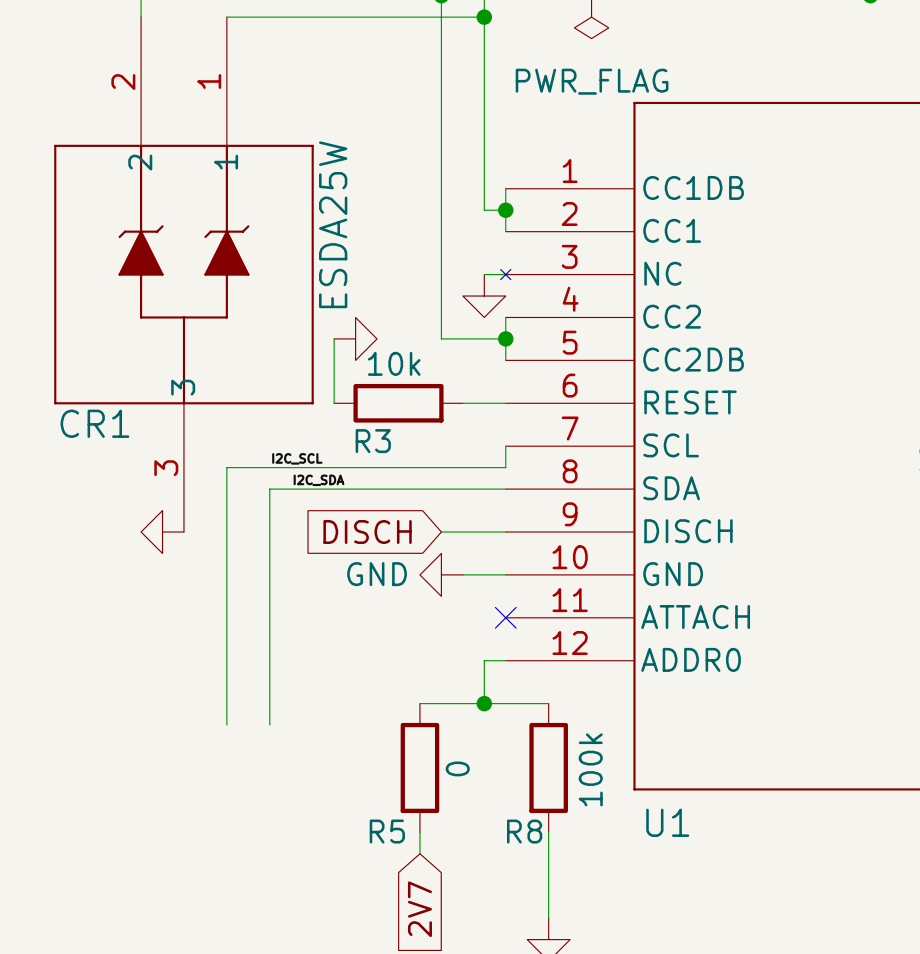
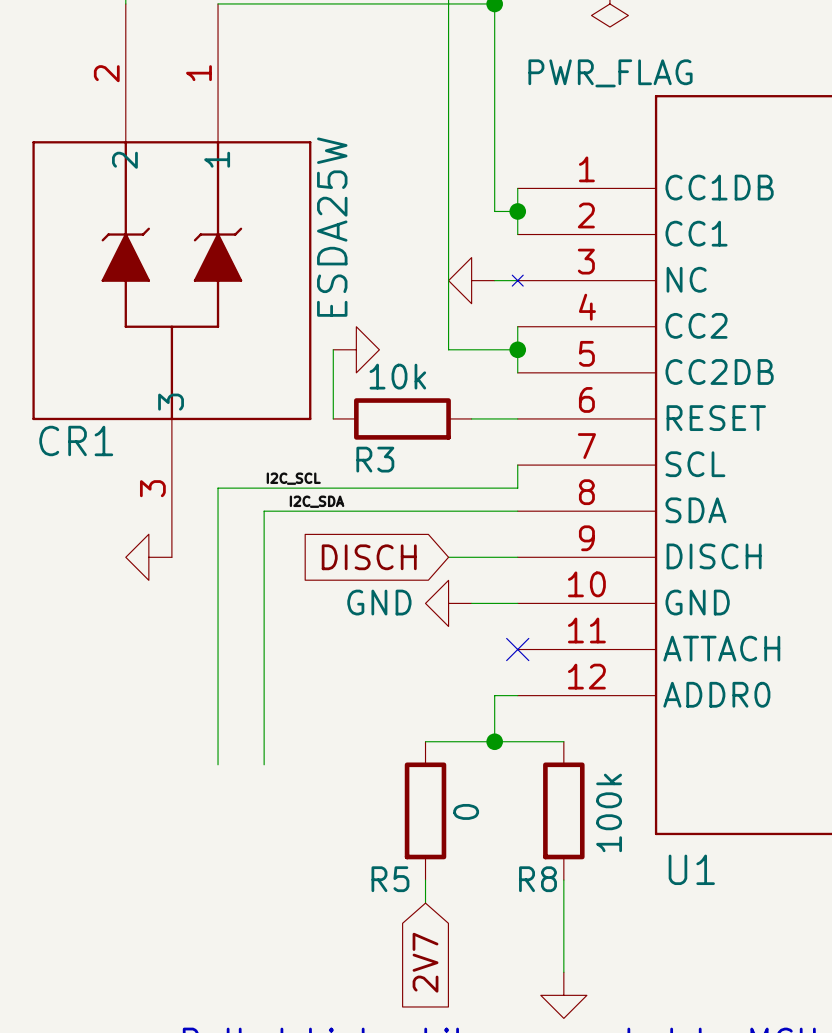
power symbol rotation: 0° (484, 296) -> 90° clockwise (471, 280)
power symbol position: (484, 296) -> (471, 280)

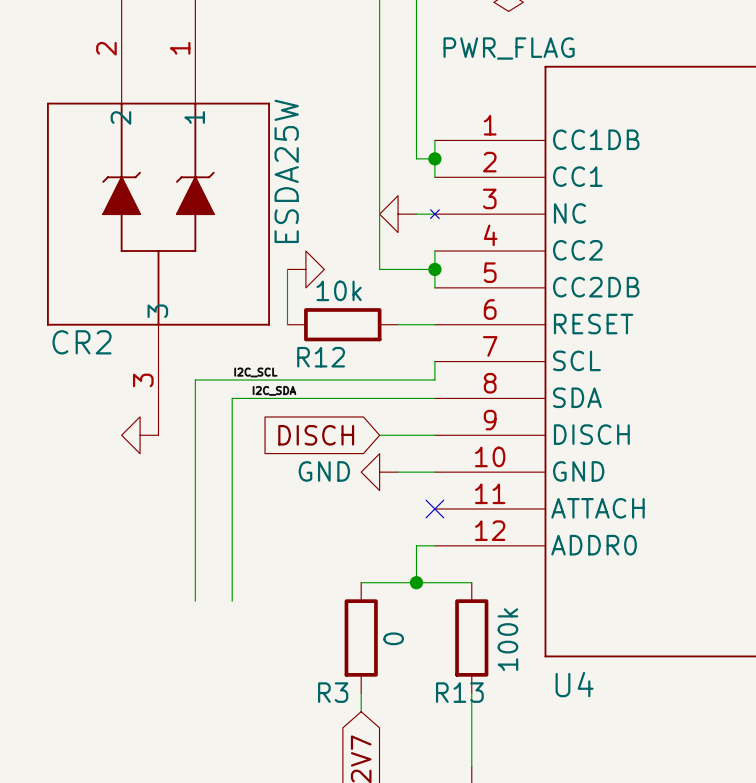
CR1 name: CR1 (76, 440) -> CR2 (82, 342)
R3 name: R3 (375, 459) -> R12 (321, 357)
U1 name: U1 (691, 869) -> U4 (574, 684)
R5 name: R5 (390, 879) -> R3 (333, 692)
R8 name: R8 (538, 879) -> R13 (459, 692)

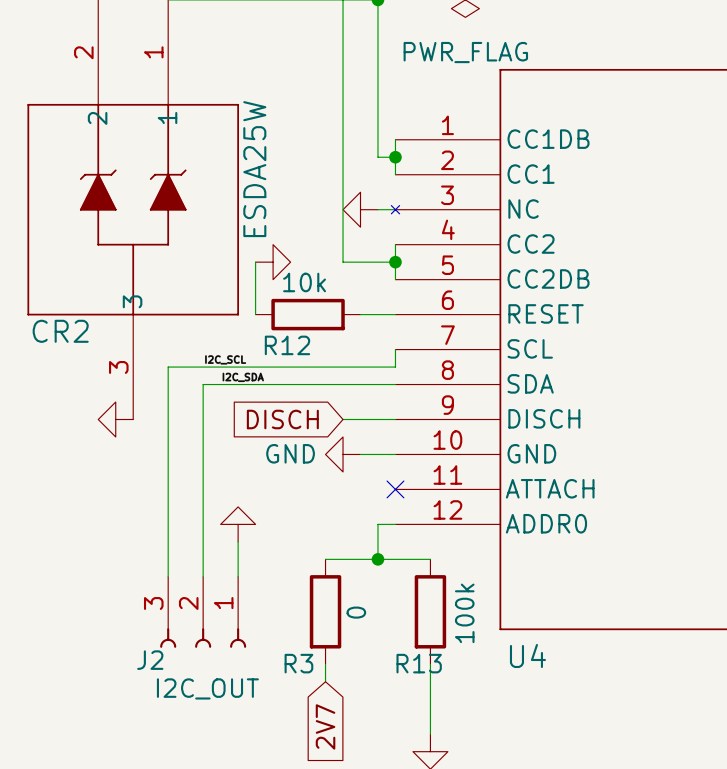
power symbol: none -> (238, 524)
wire: none -> (238, 541) (238, 576)
J2: none -> I2C_OUT (203, 612)

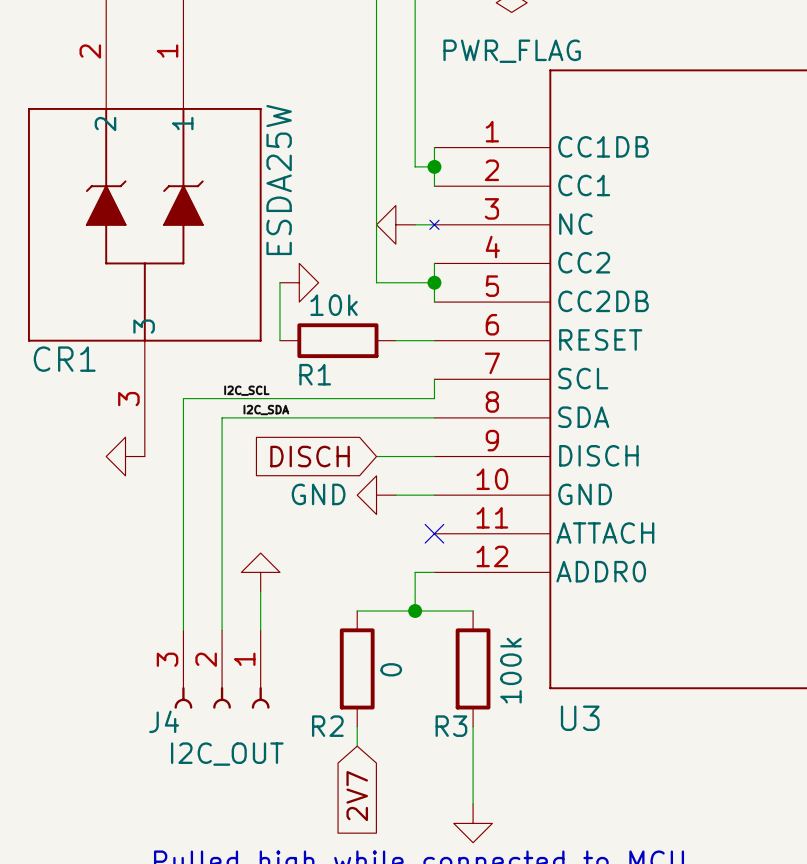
CR2 name: CR2 (60, 331) -> CR1 (64, 359)
R12 name: R12 (287, 345) -> R1 (315, 374)
U4 name: U4 (527, 655) -> U3 (580, 718)
J2 name: J2 (150, 660) -> J4 (164, 721)
R3 name: R3 (298, 663) -> R2 (327, 726)
R13 name: R13 (419, 663) -> R3 (451, 726)

